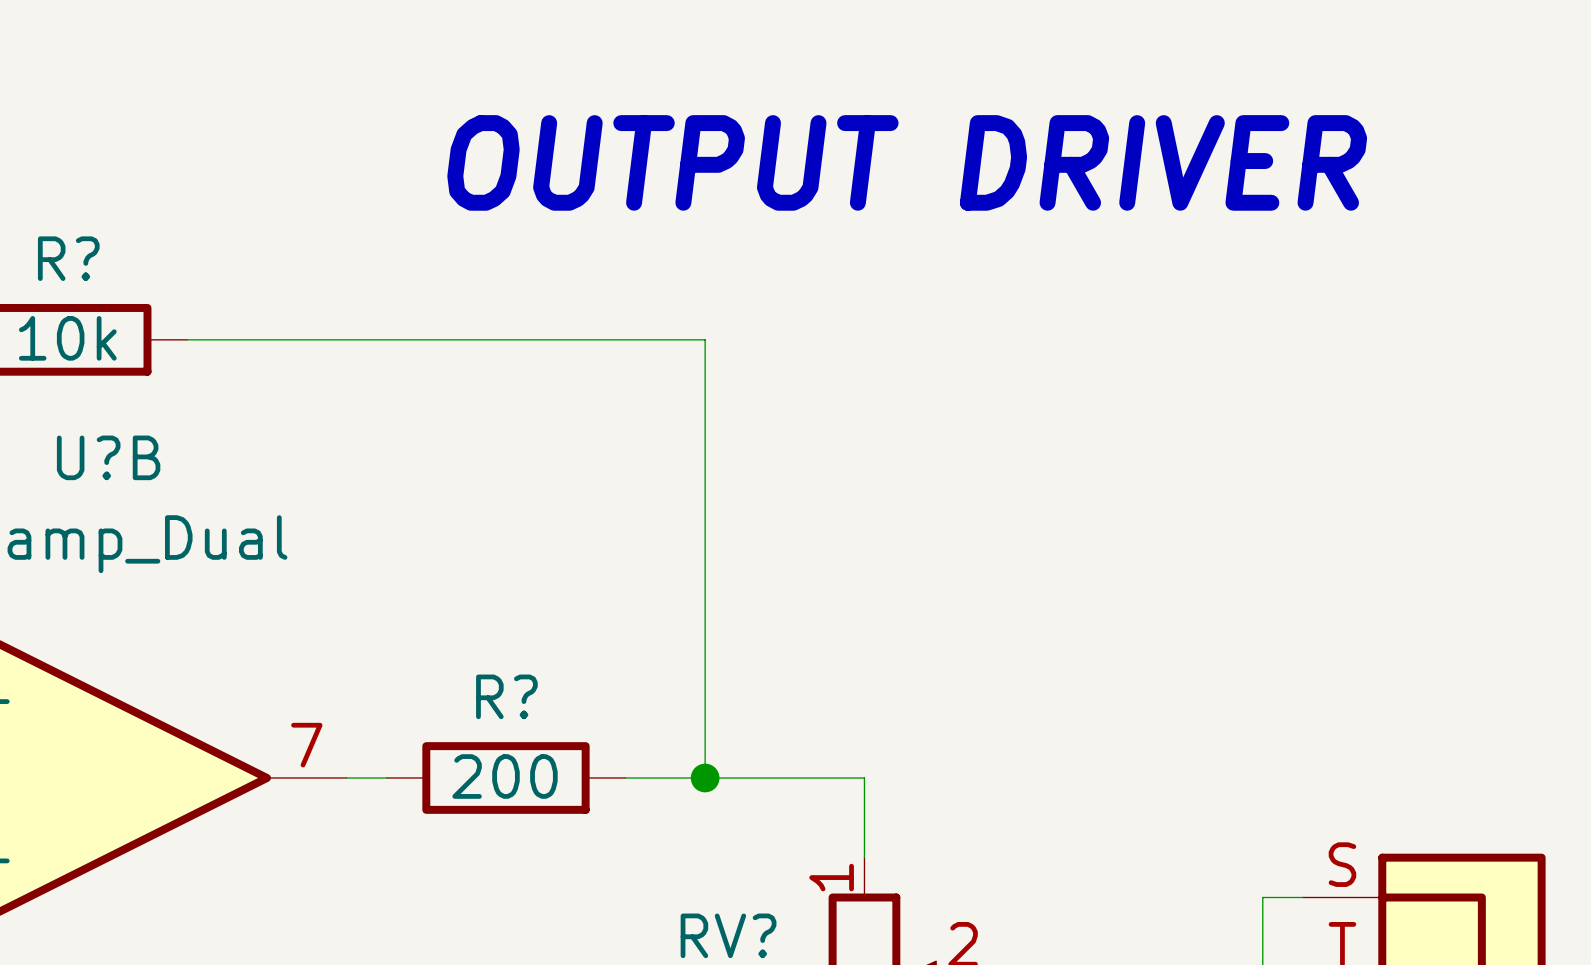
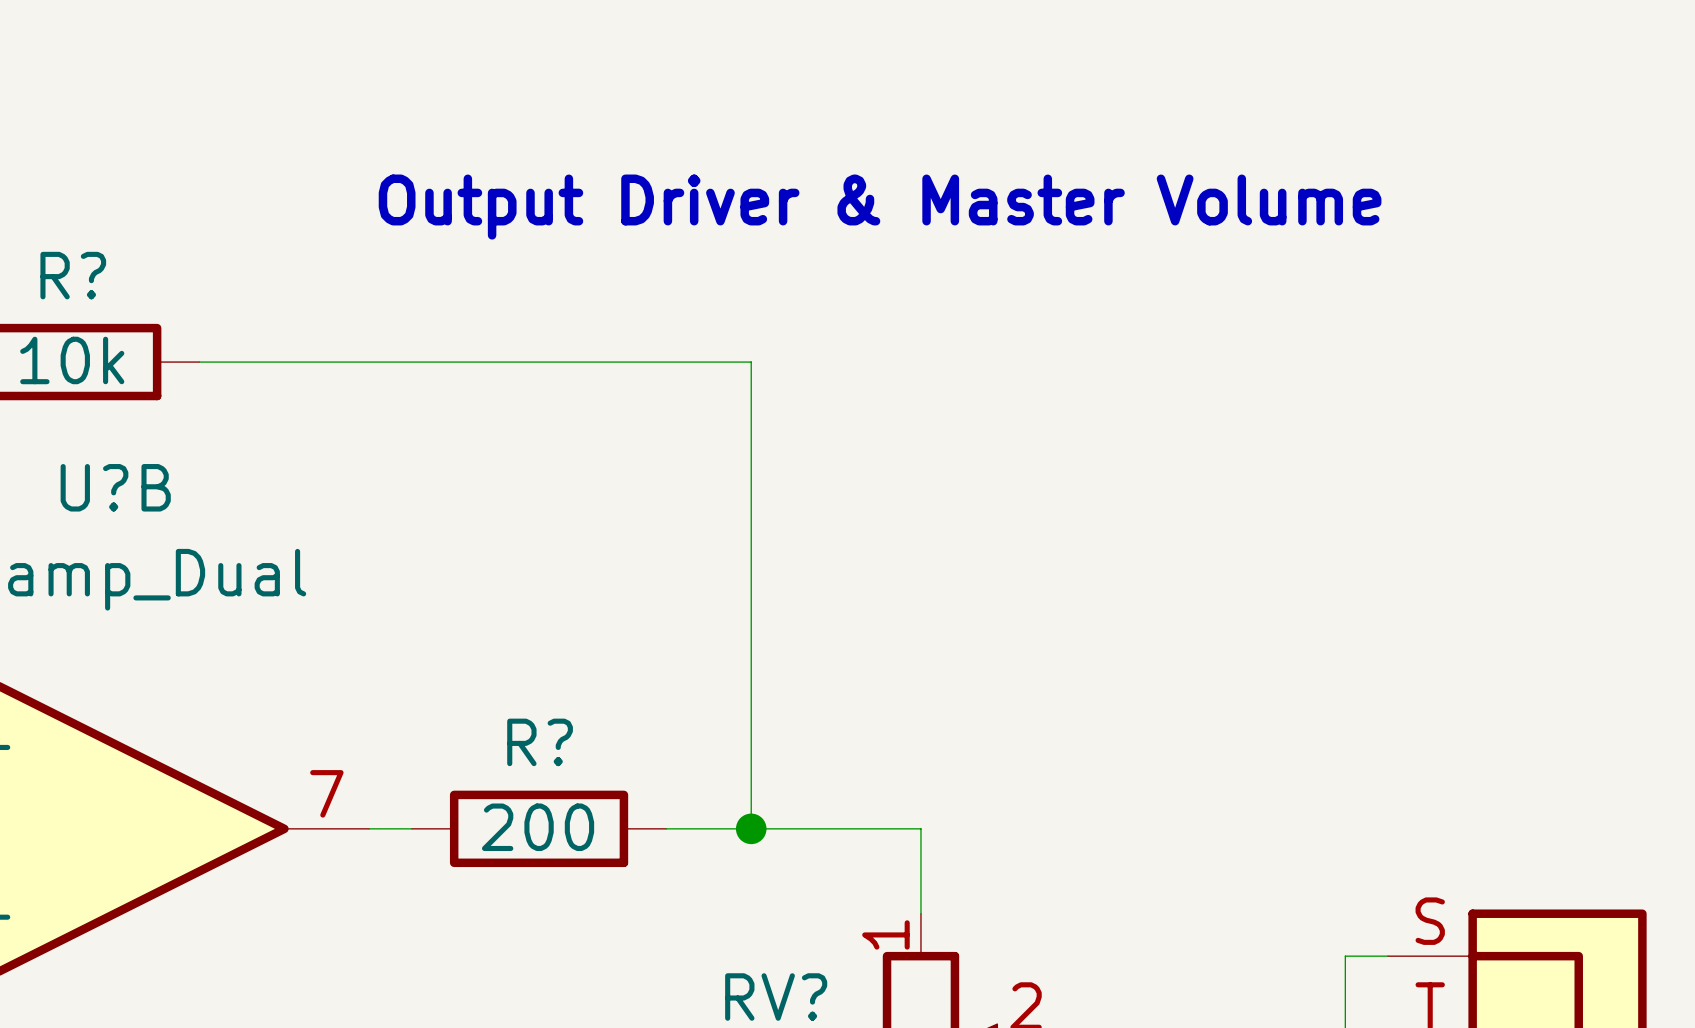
text: OUTPUT DRIVER (907, 162) -> none
text: none -> Output Driver & Master Volume (880, 207)

